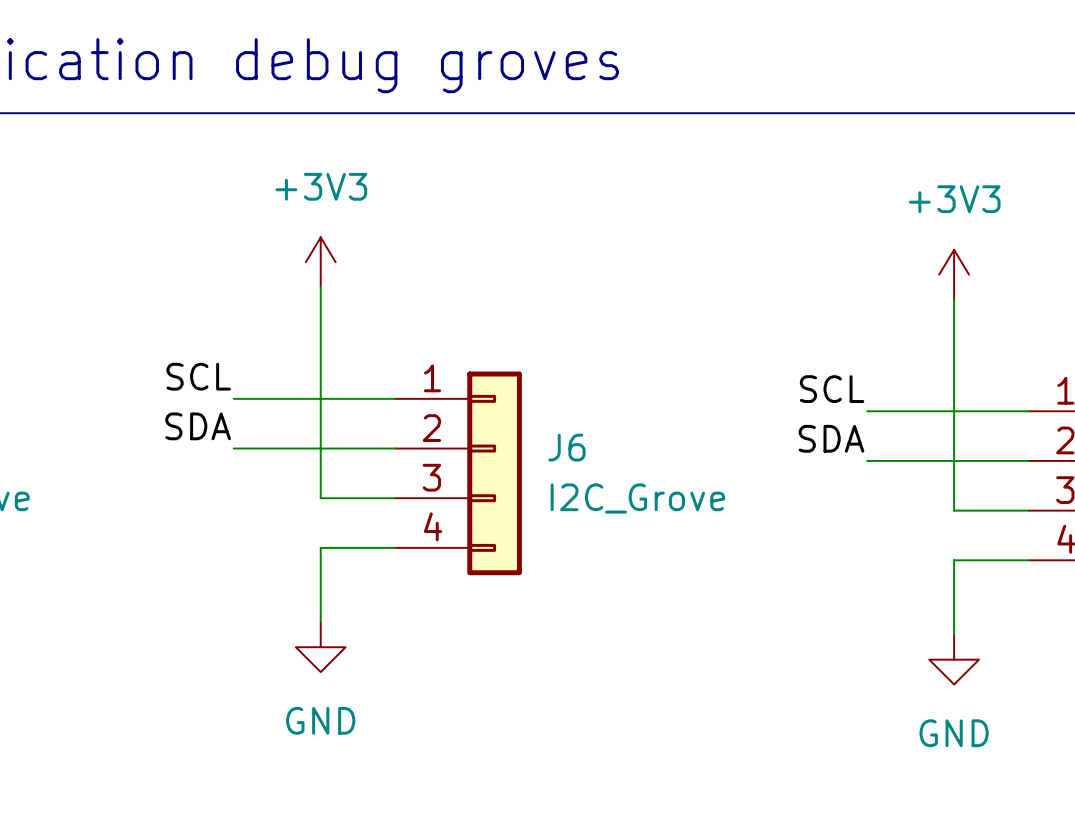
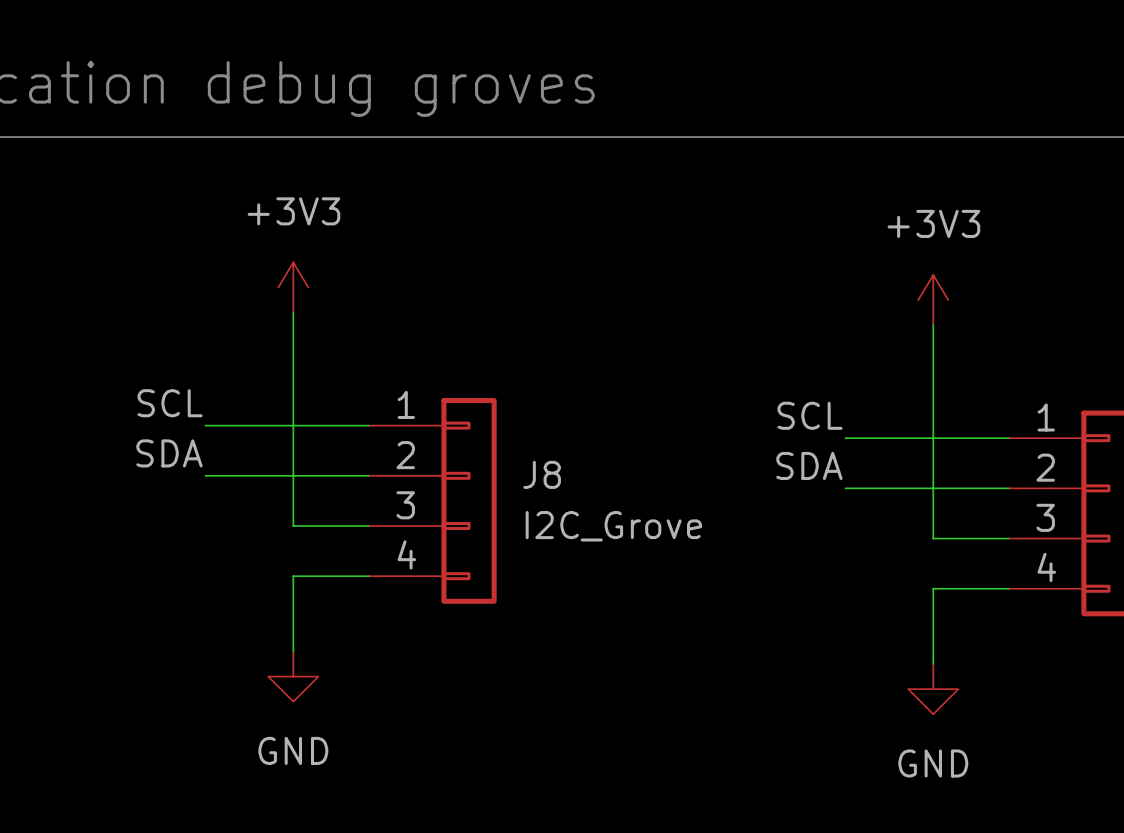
J6 name: J6 (566, 447) -> J8 (542, 474)

